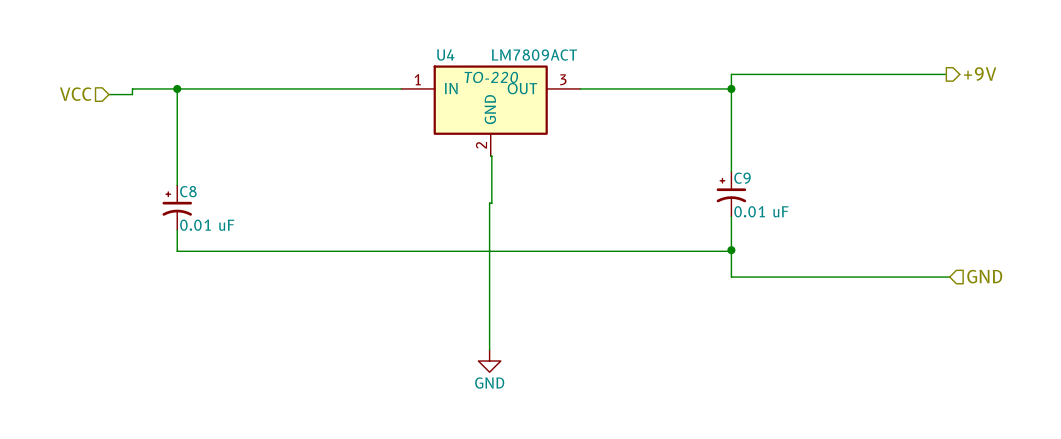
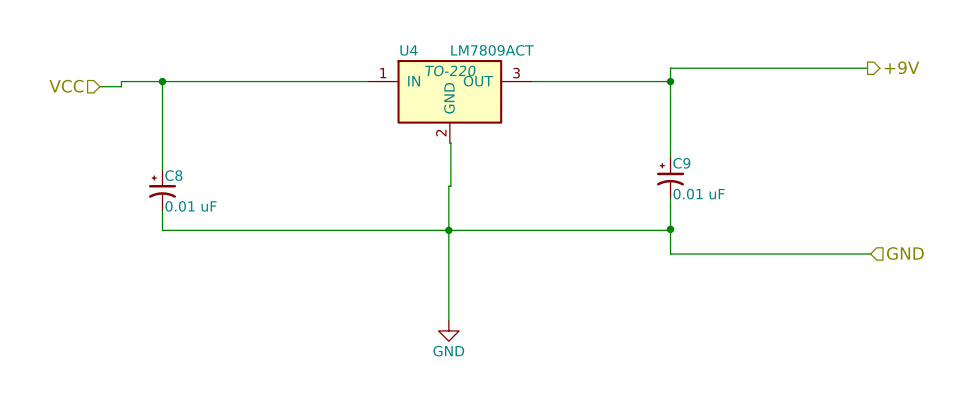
junction: none -> (448, 230)

